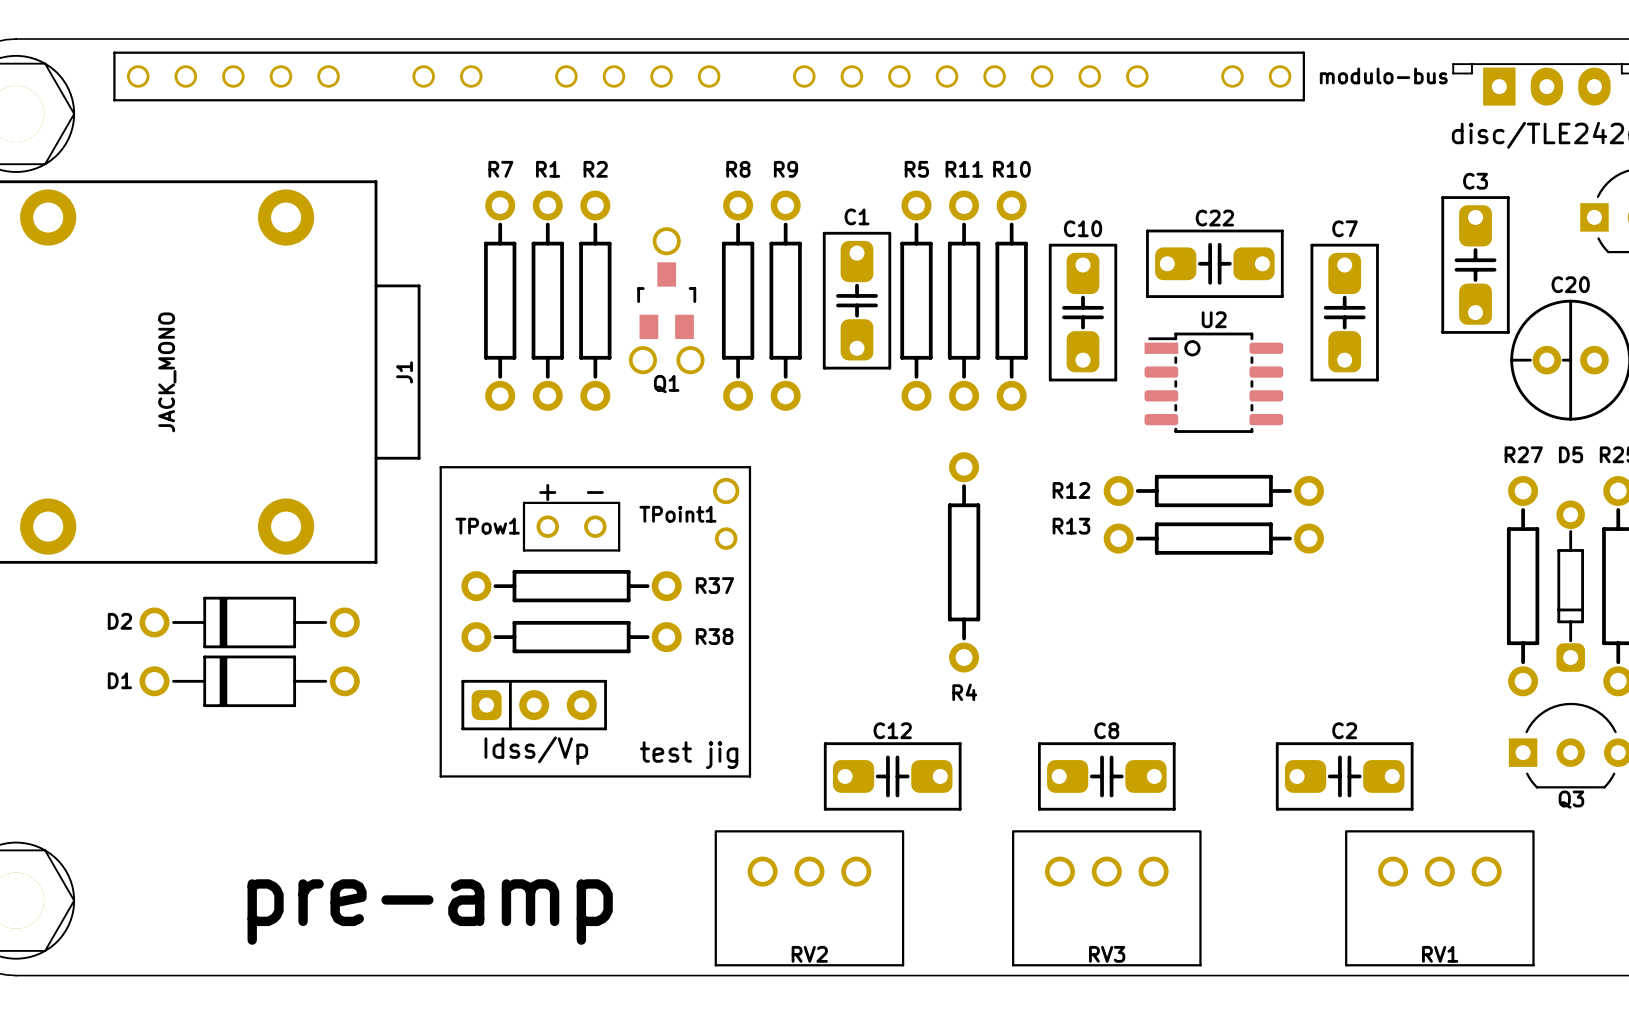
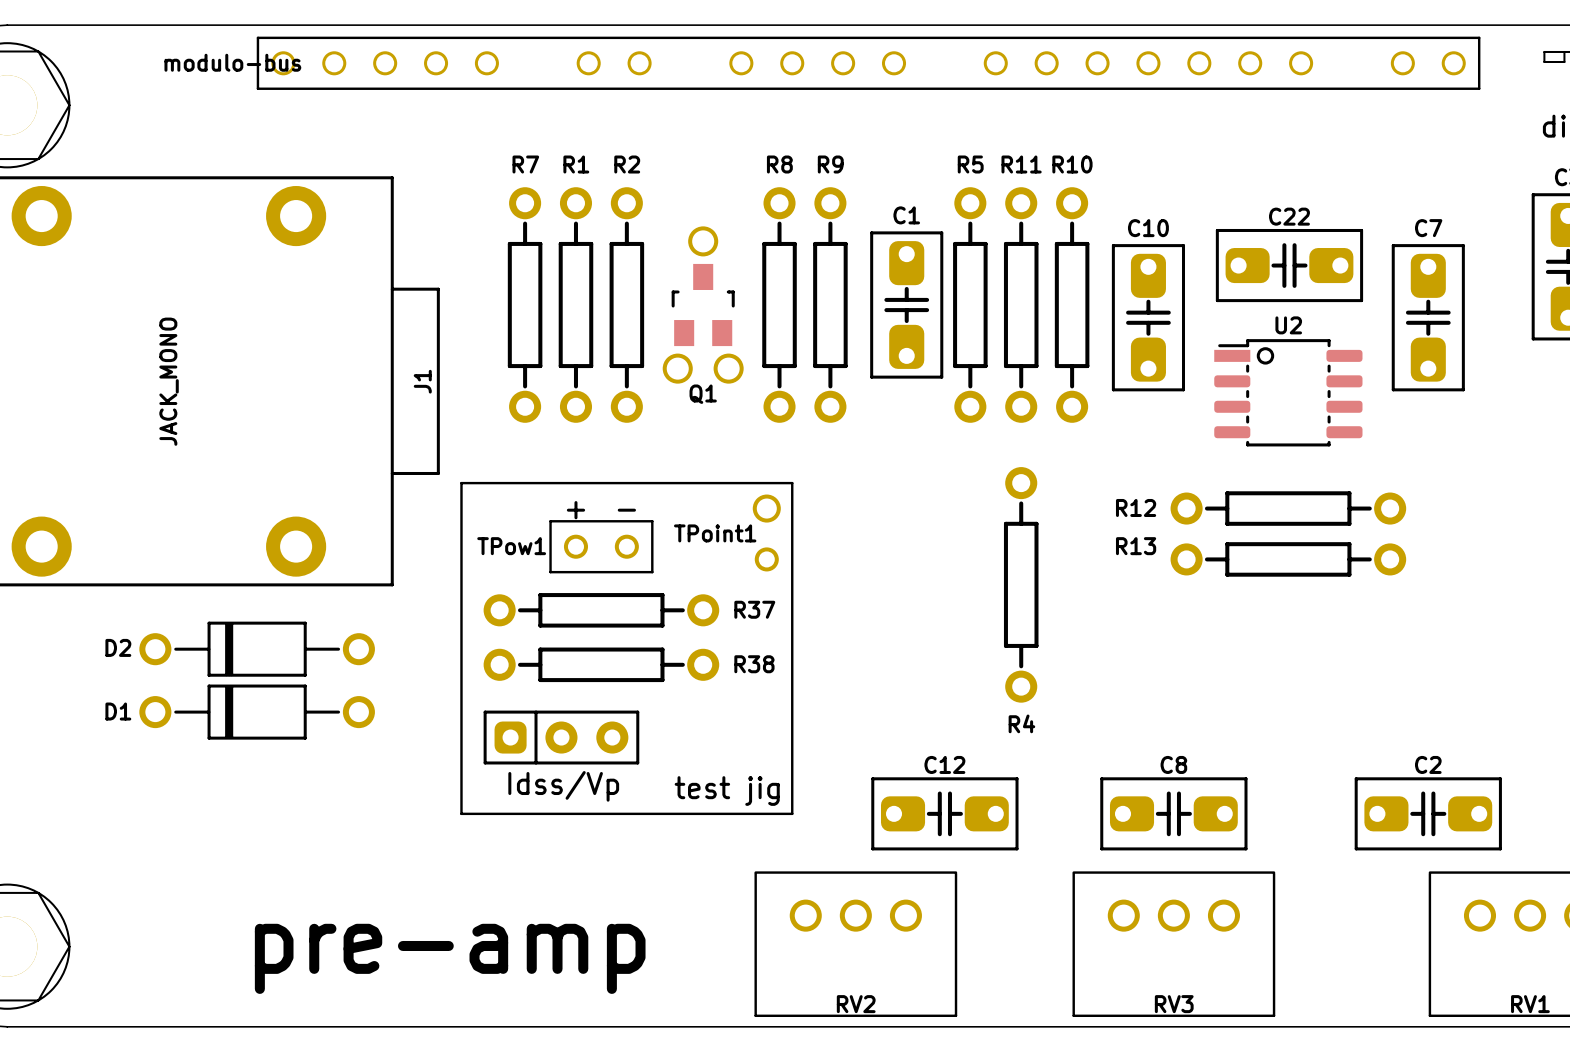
part: none -> modulo-bus (868, 63)
part: modulo-bus (709, 76) -> none

